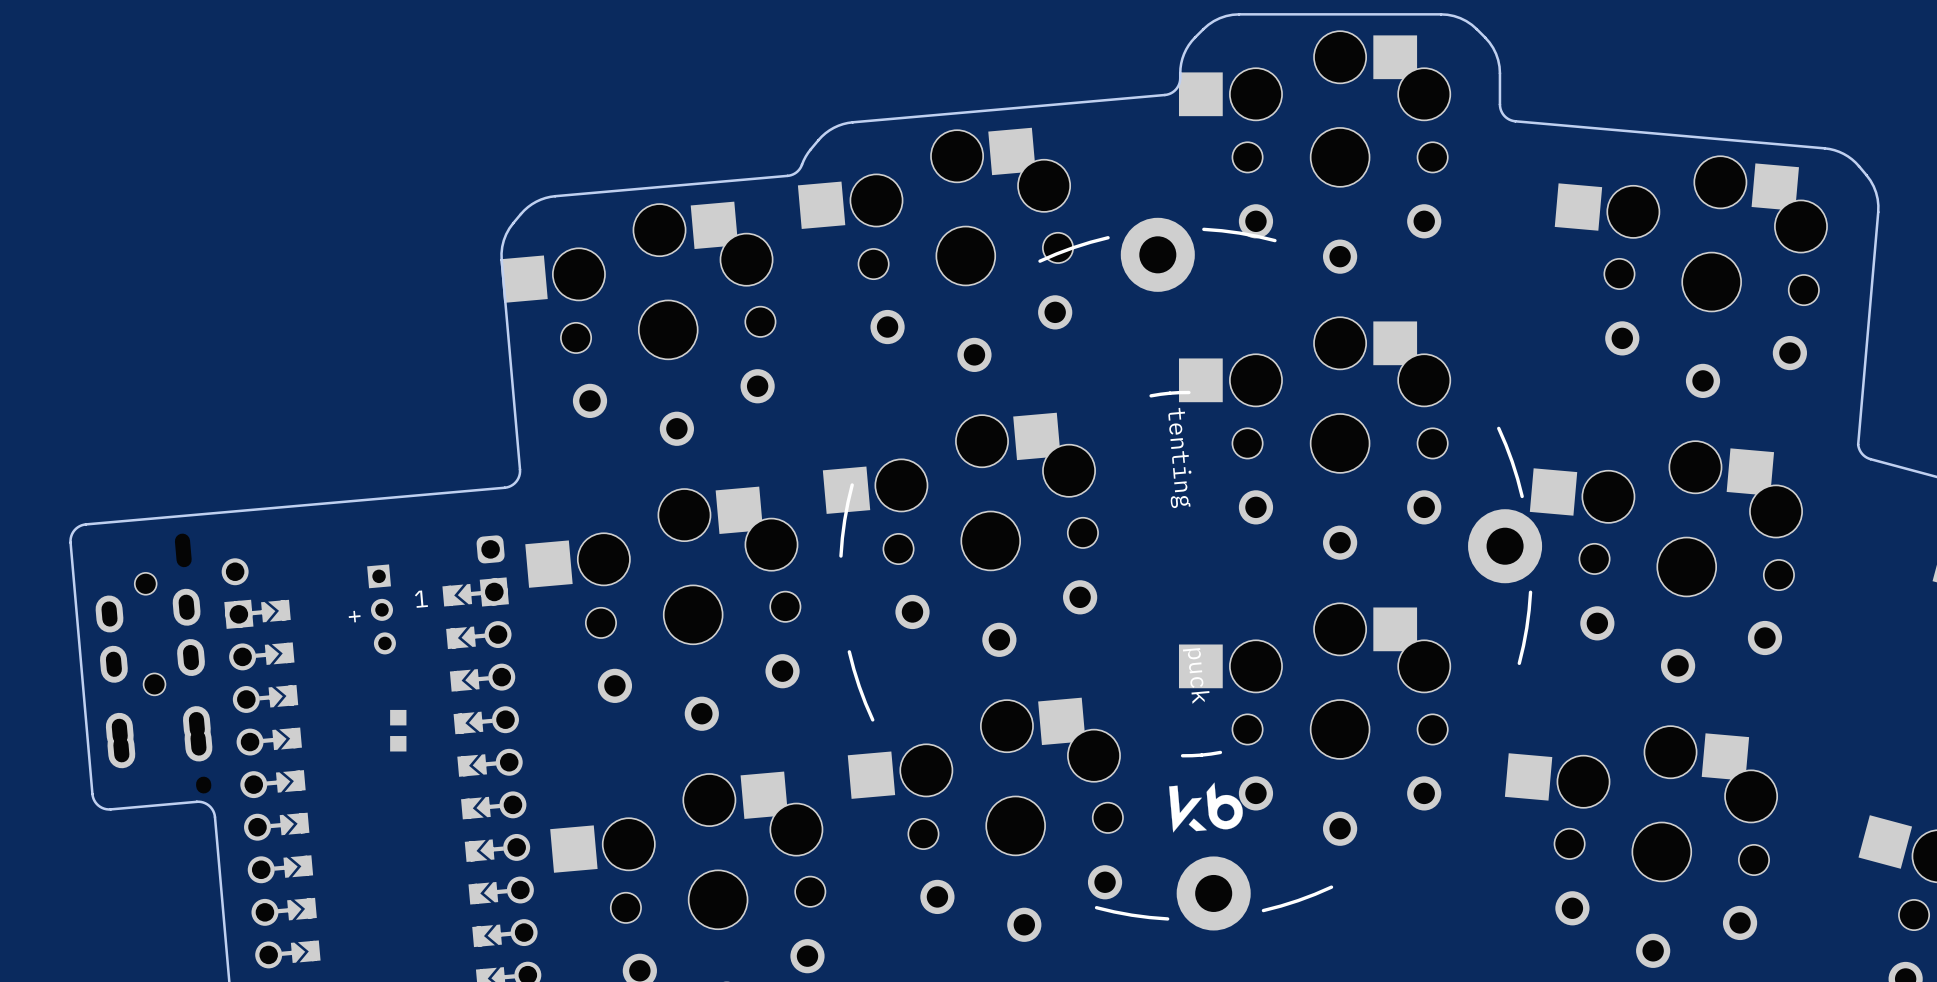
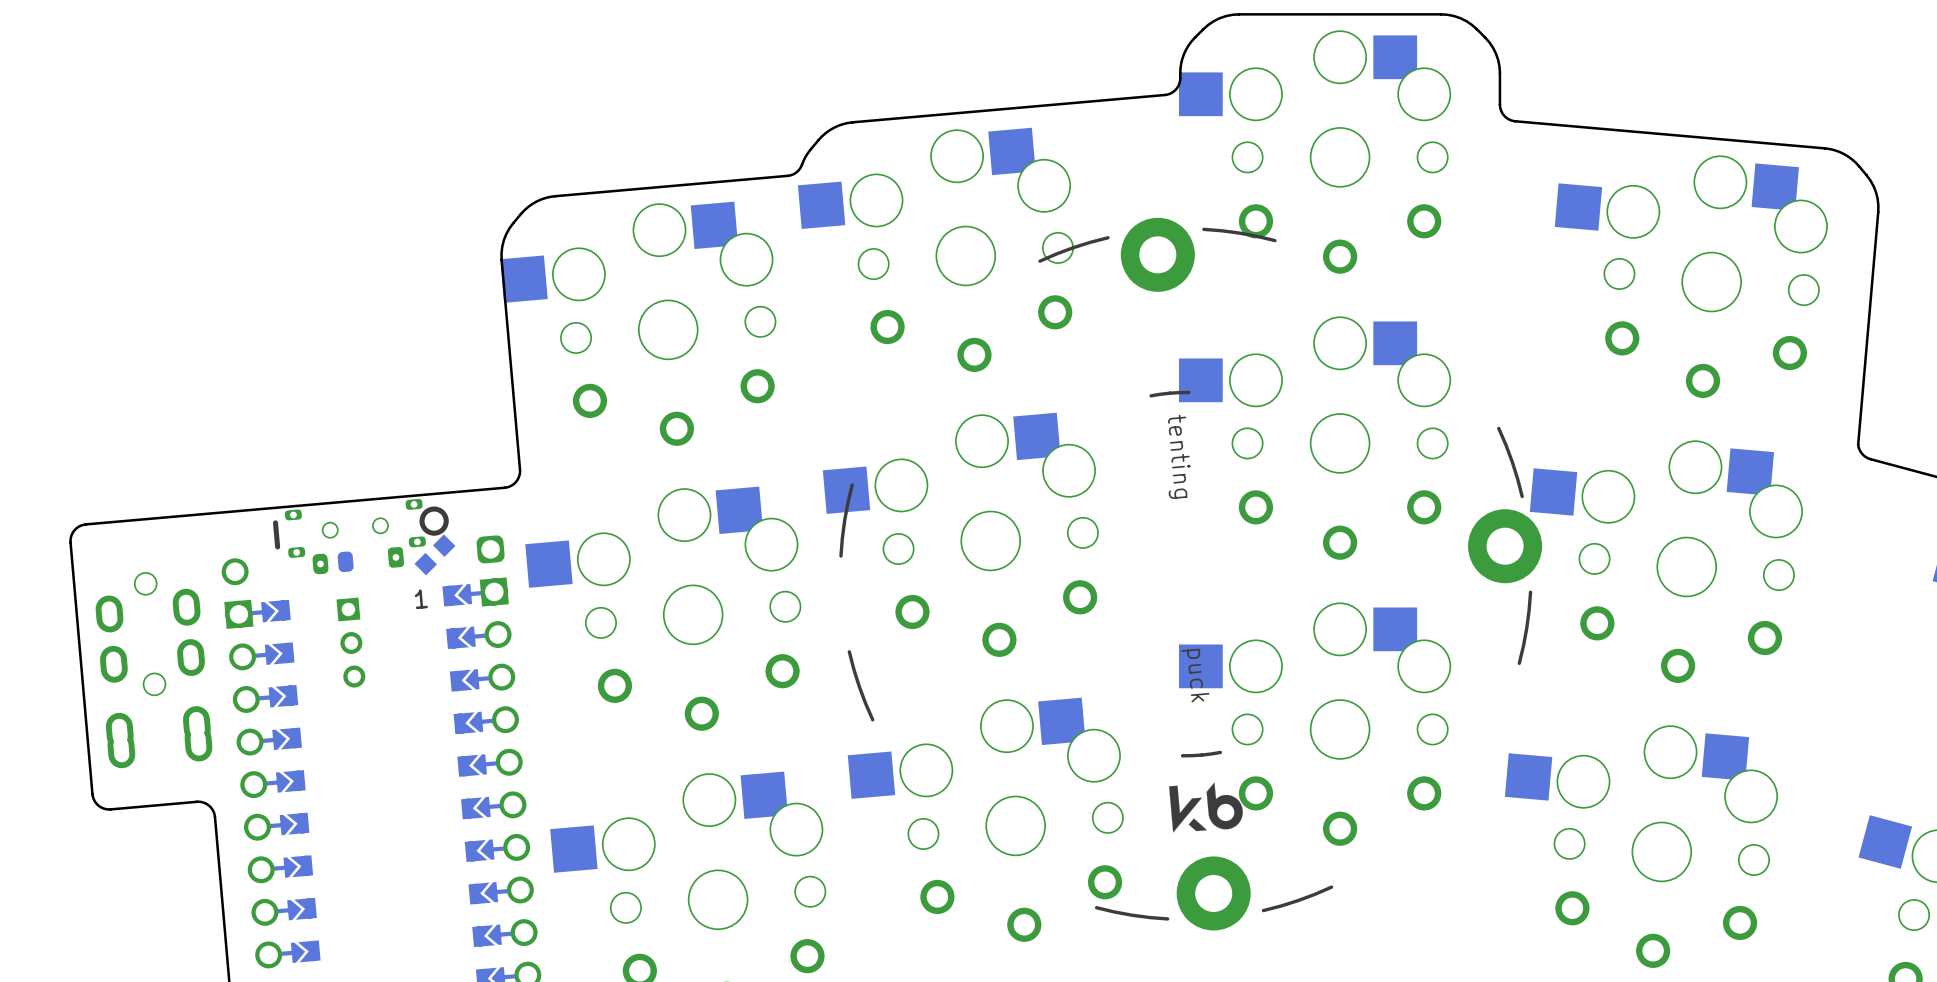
part: none -> (360, 536)
part: none -> (434, 554)
part position: (381, 609) -> (350, 642)
text: + (354, 616) -> none
part: (398, 730) -> none

